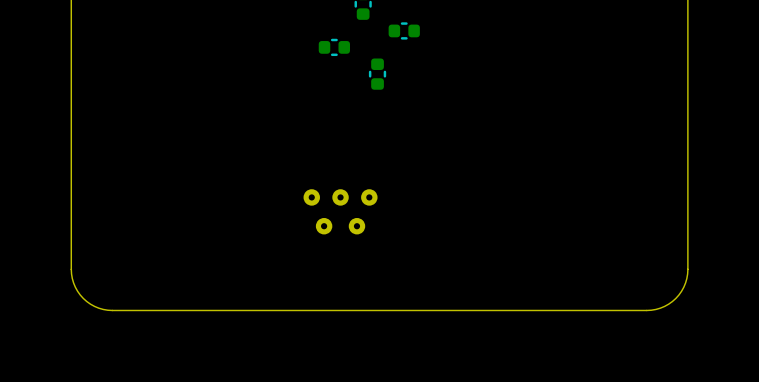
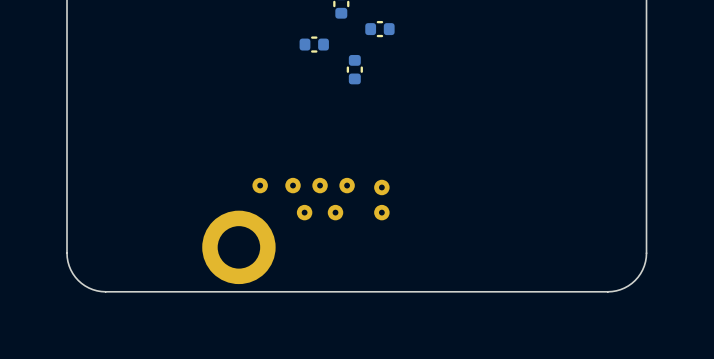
part: none -> (260, 185)
part: none -> (381, 187)
part: none -> (381, 212)
part: none -> (238, 247)

